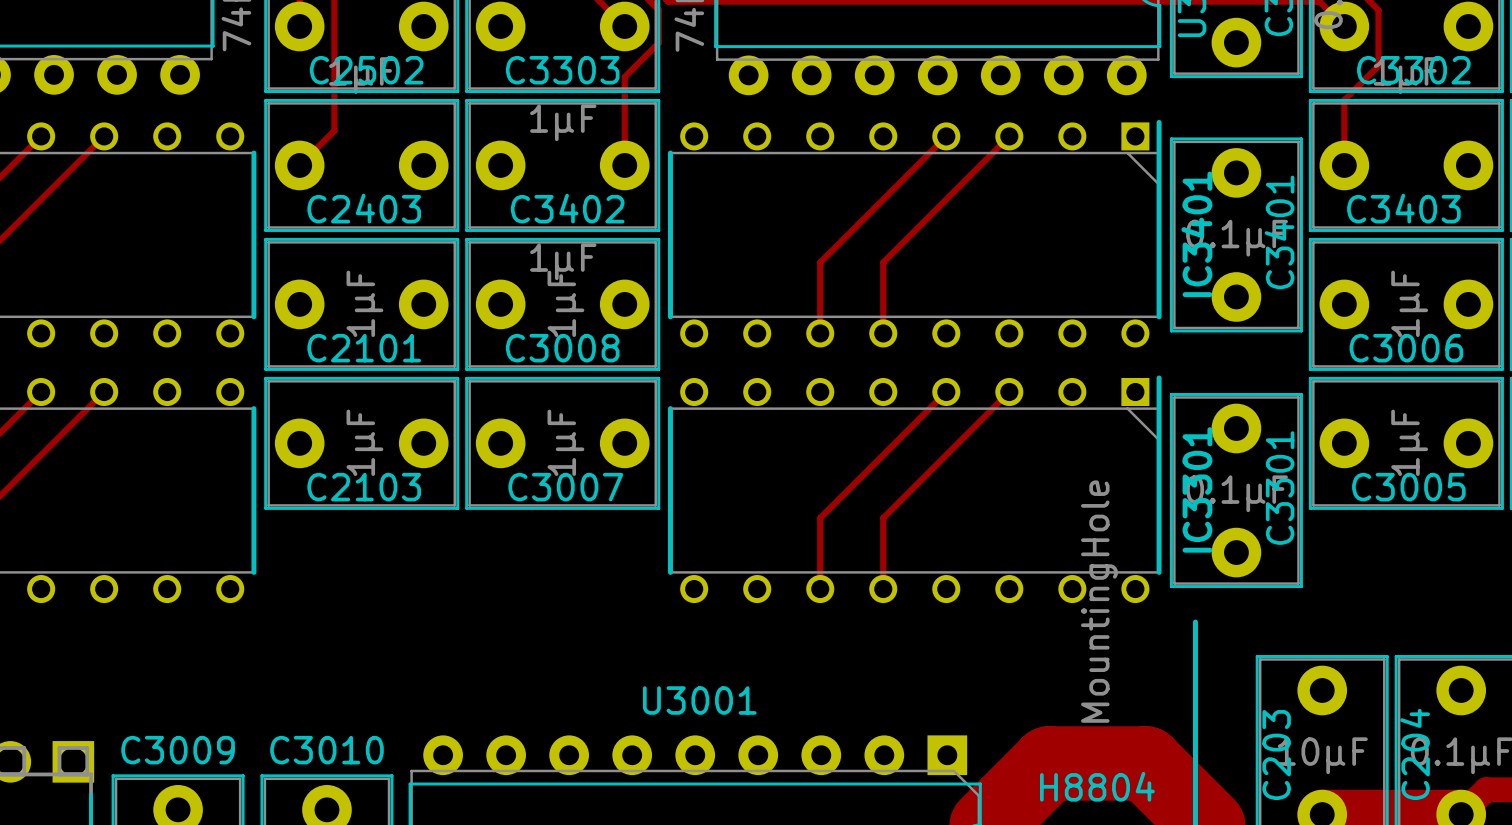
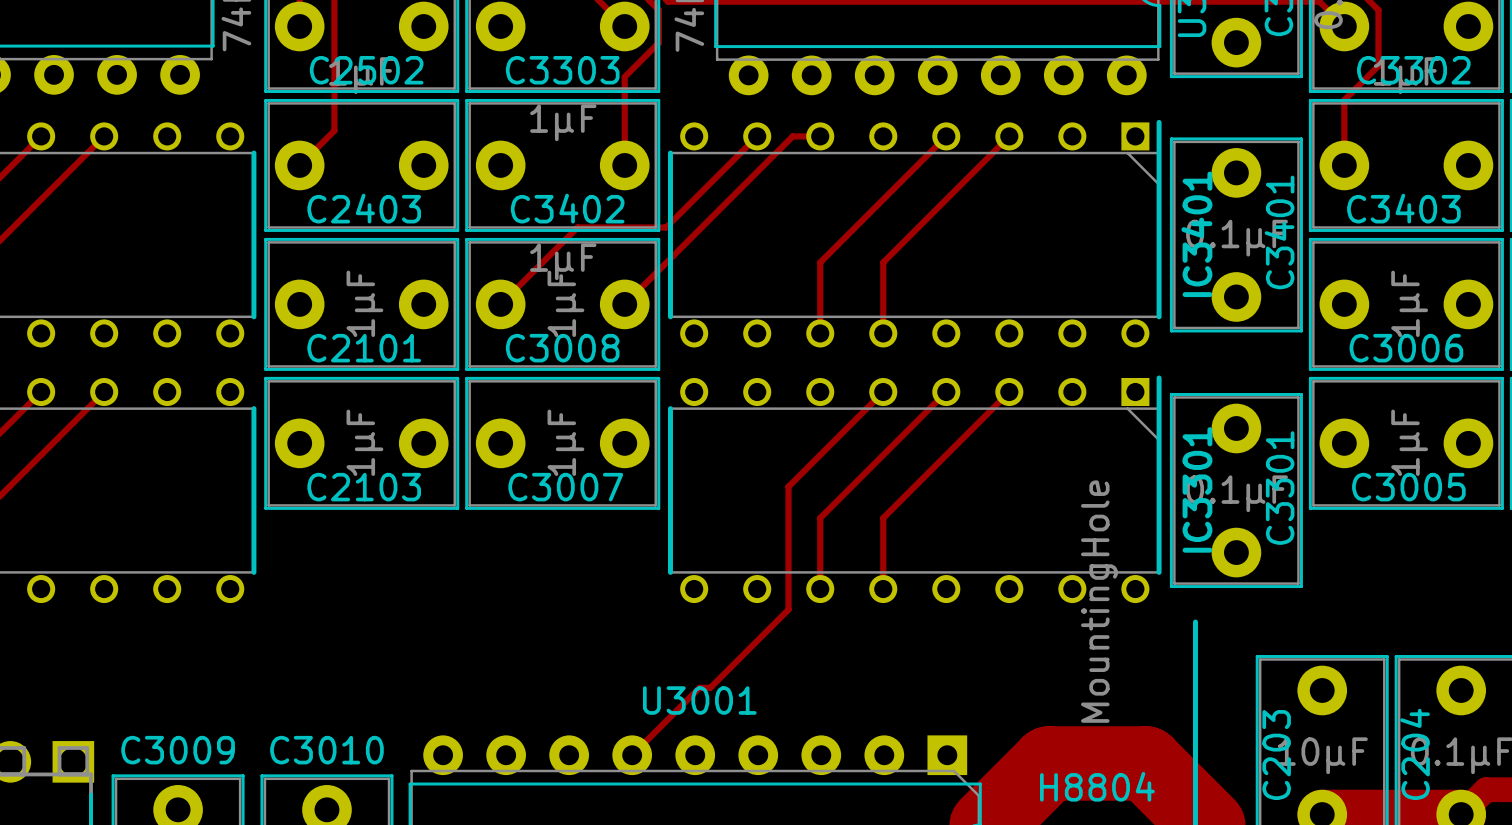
track: none -> (757, 136) (666, 227) (577, 227) (500, 304)
track: none -> (820, 136) (792, 136) (624, 304)
track: none -> (883, 392) (788, 486) (788, 609) (710, 687) (699, 687) (632, 755)

